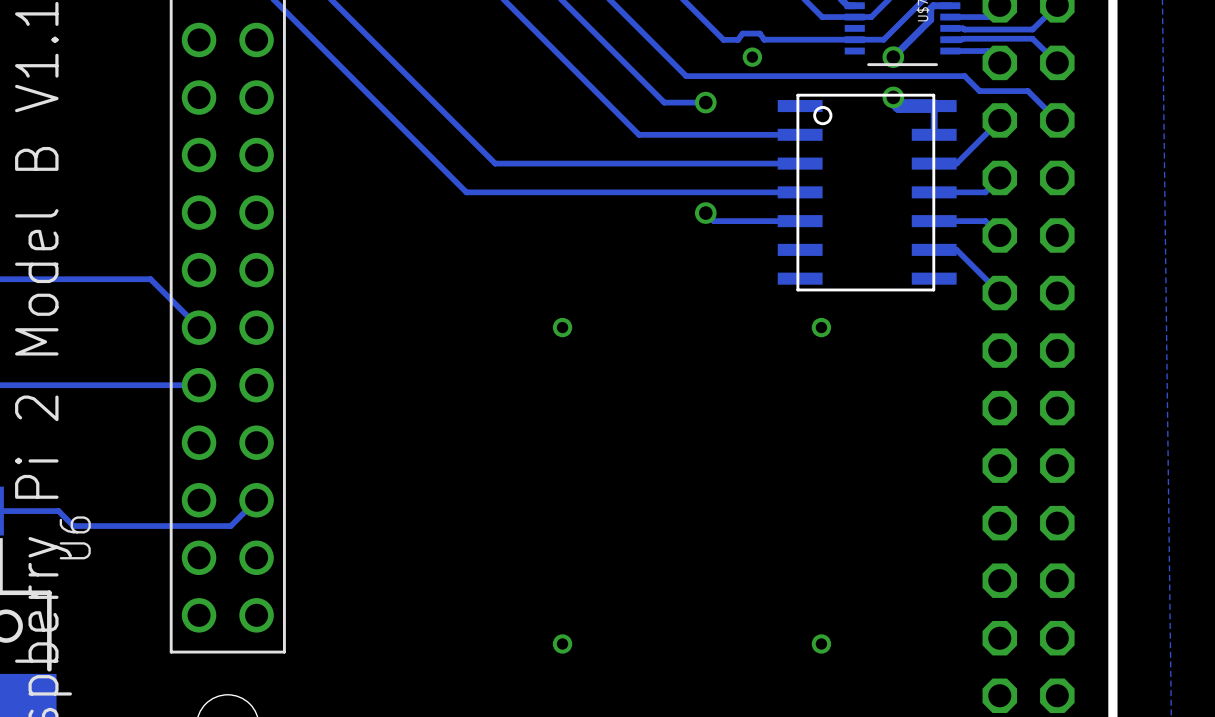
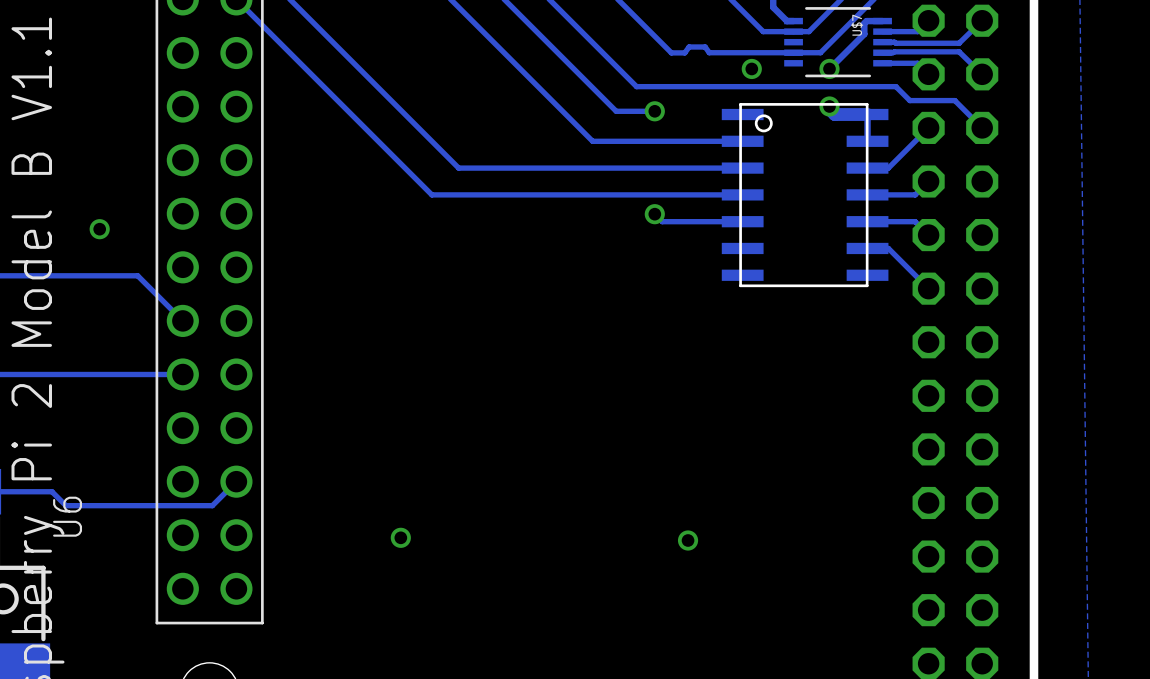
via: (752, 57) -> none
via: none -> (751, 68)
via: none -> (99, 229)
via: (562, 327) -> none
via: (821, 327) -> none
via: none -> (400, 537)
via: none -> (688, 540)
via: (562, 643) -> none
via: (821, 643) -> none

